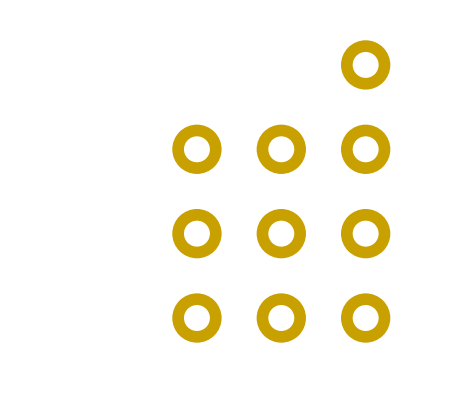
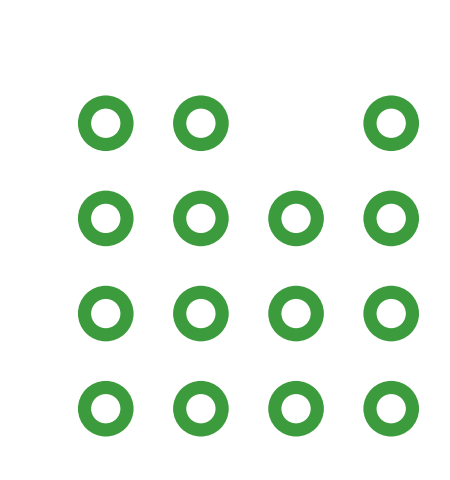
part: none -> (105, 123)
part: none -> (200, 123)
part: none -> (105, 218)
part: none -> (105, 313)
part: none -> (105, 408)

